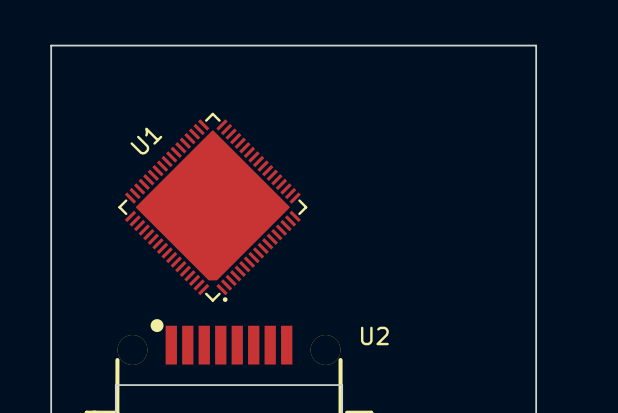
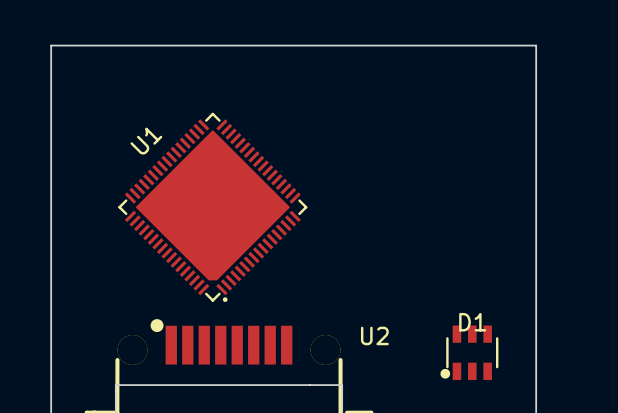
D1: none -> (469, 352)

